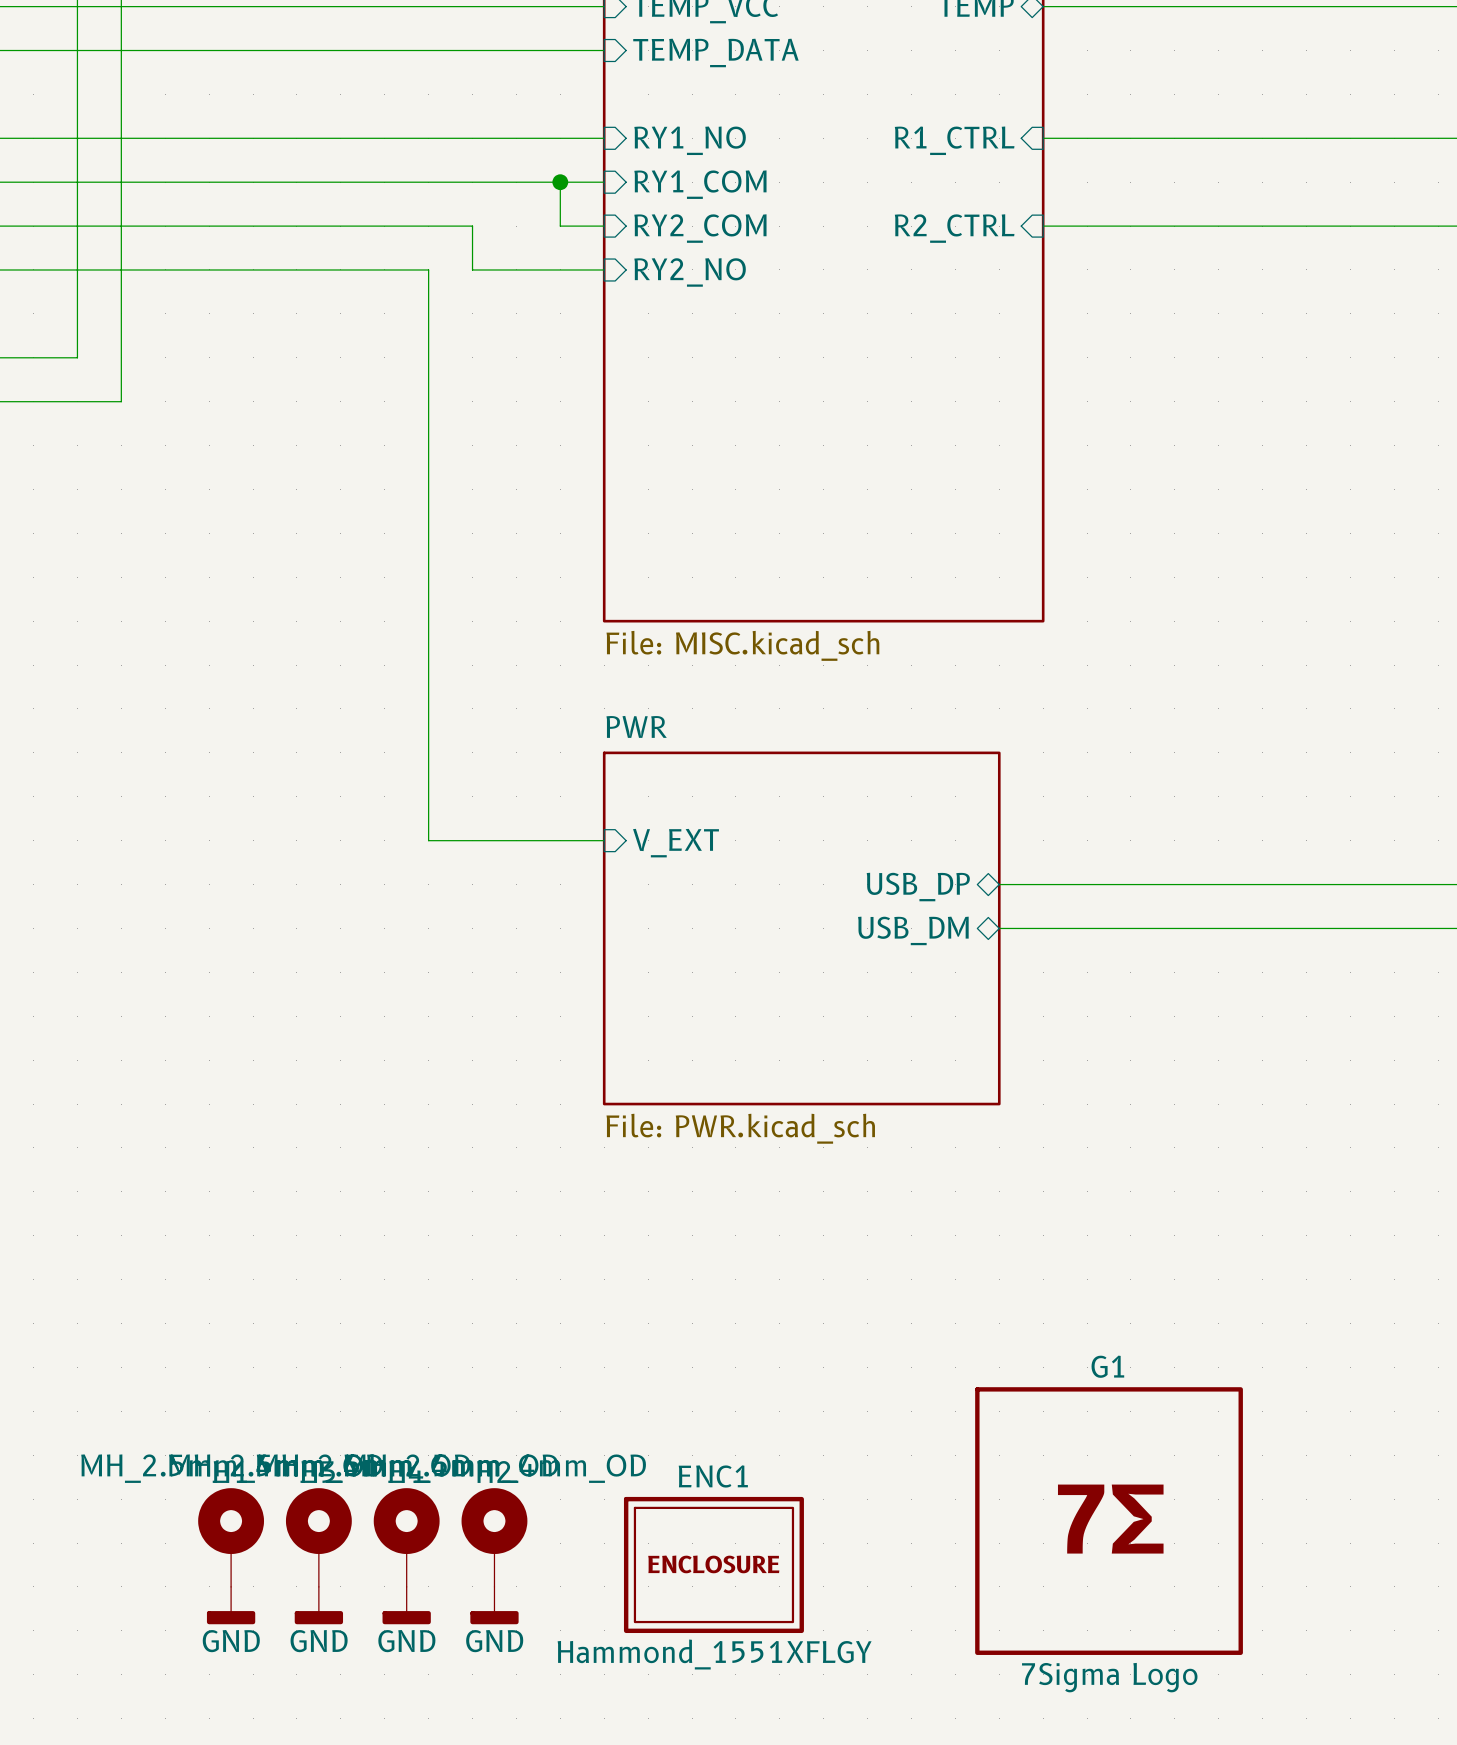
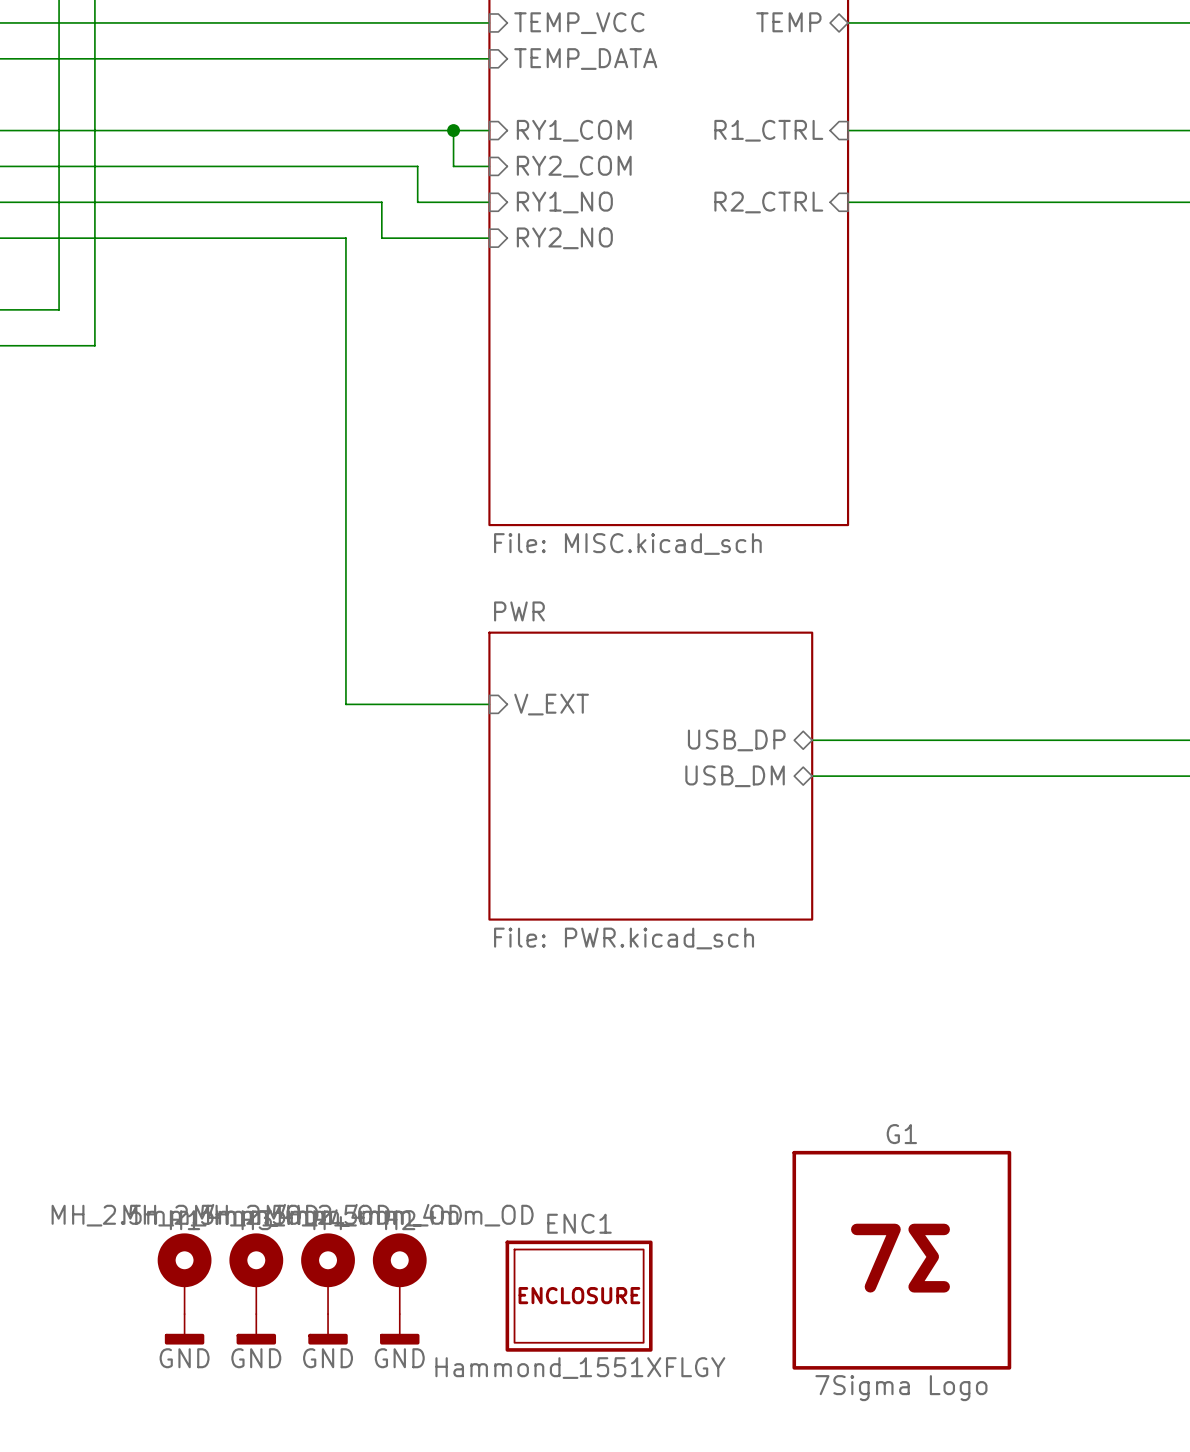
wire: none -> (453, 130) (453, 166)
sheet pin: RY1_NO (690, 140) -> RY1_COM (574, 130)
wire: (516, 182) (560, 182) (560, 226) -> (417, 166) (417, 202) (453, 202)
junction position: (560, 182) -> (453, 130)
sheet pin: RY1_COM (700, 184) -> RY2_COM (574, 166)
sheet pin: RY2_COM (700, 228) -> RY1_NO (564, 202)

